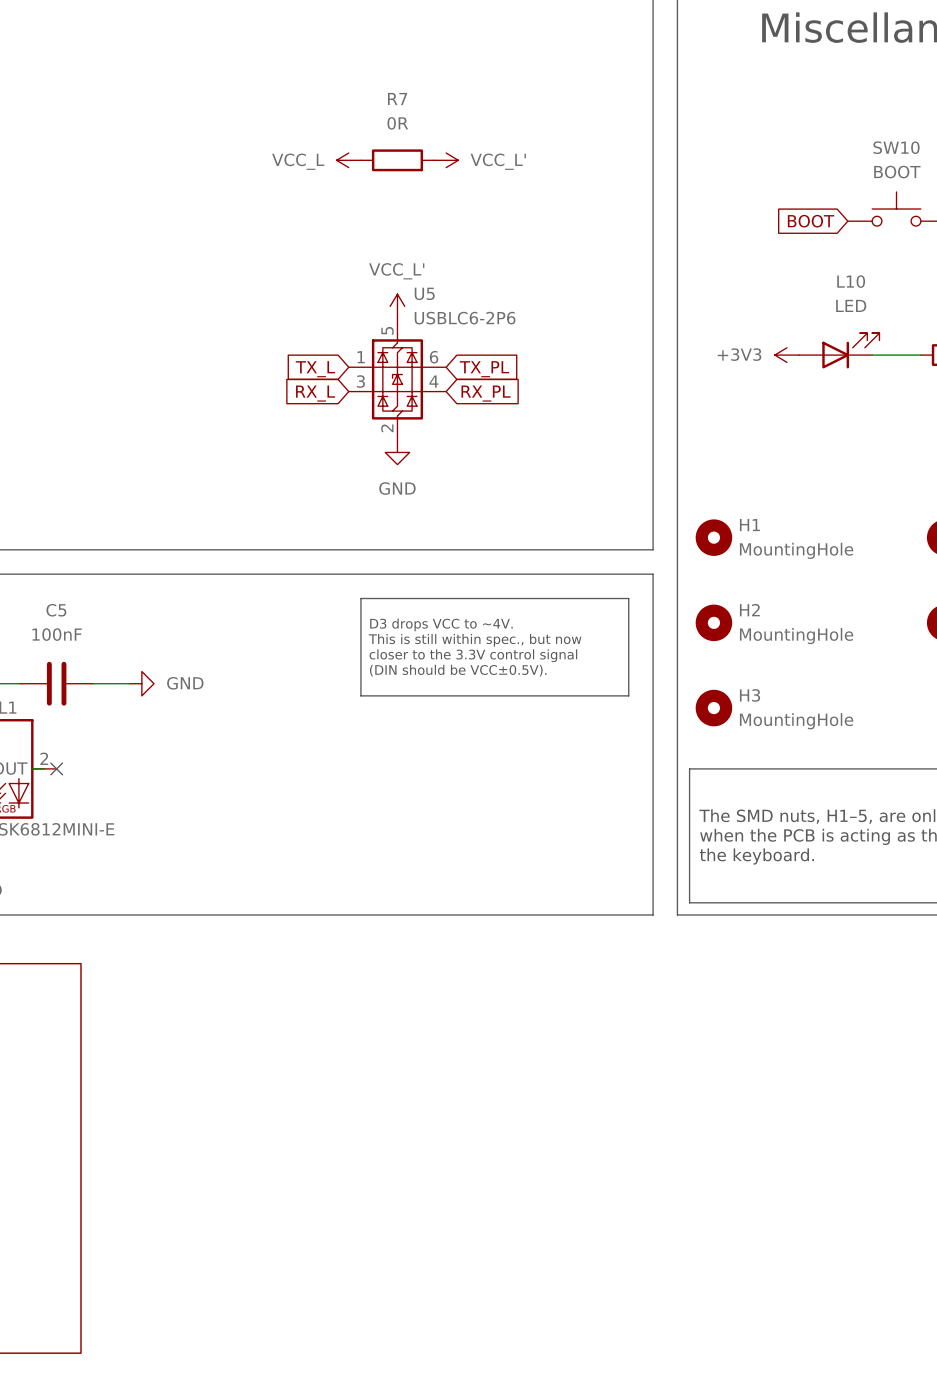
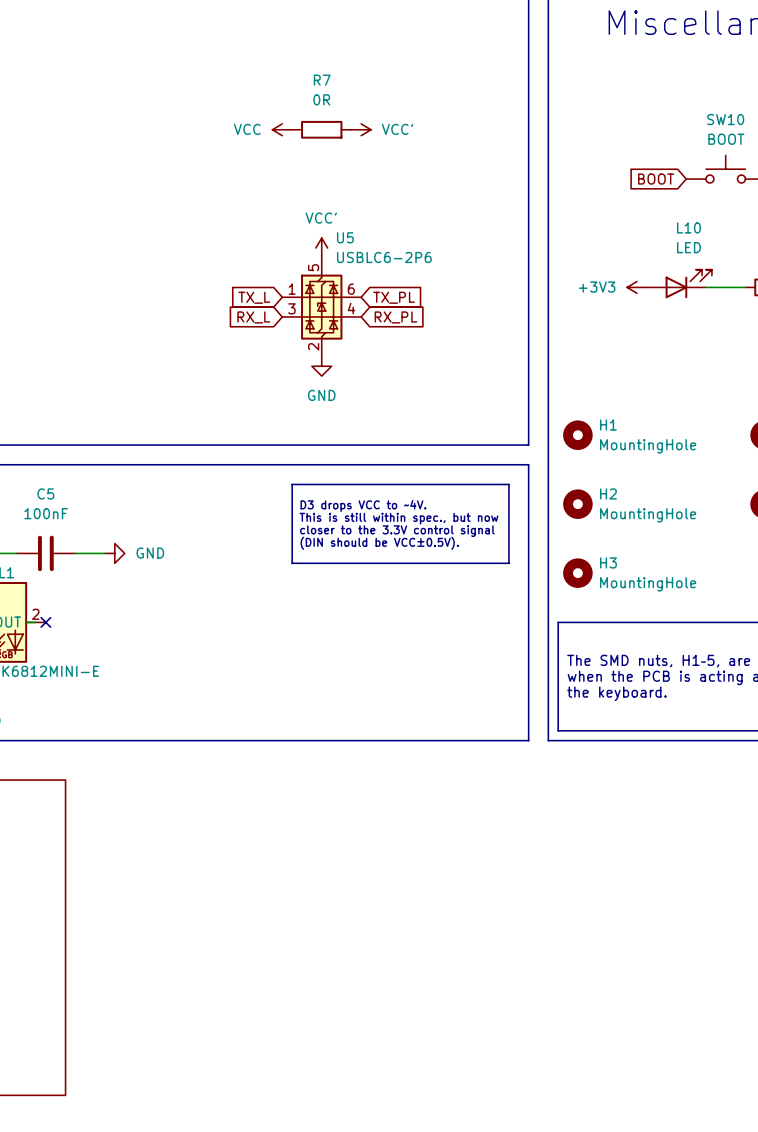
power symbol: VCC_L (348, 160) -> VCC (282, 129)
power symbol: VCC_L' (446, 160) -> VCC' (361, 129)
power symbol: VCC_L' (397, 306) -> VCC' (321, 248)

